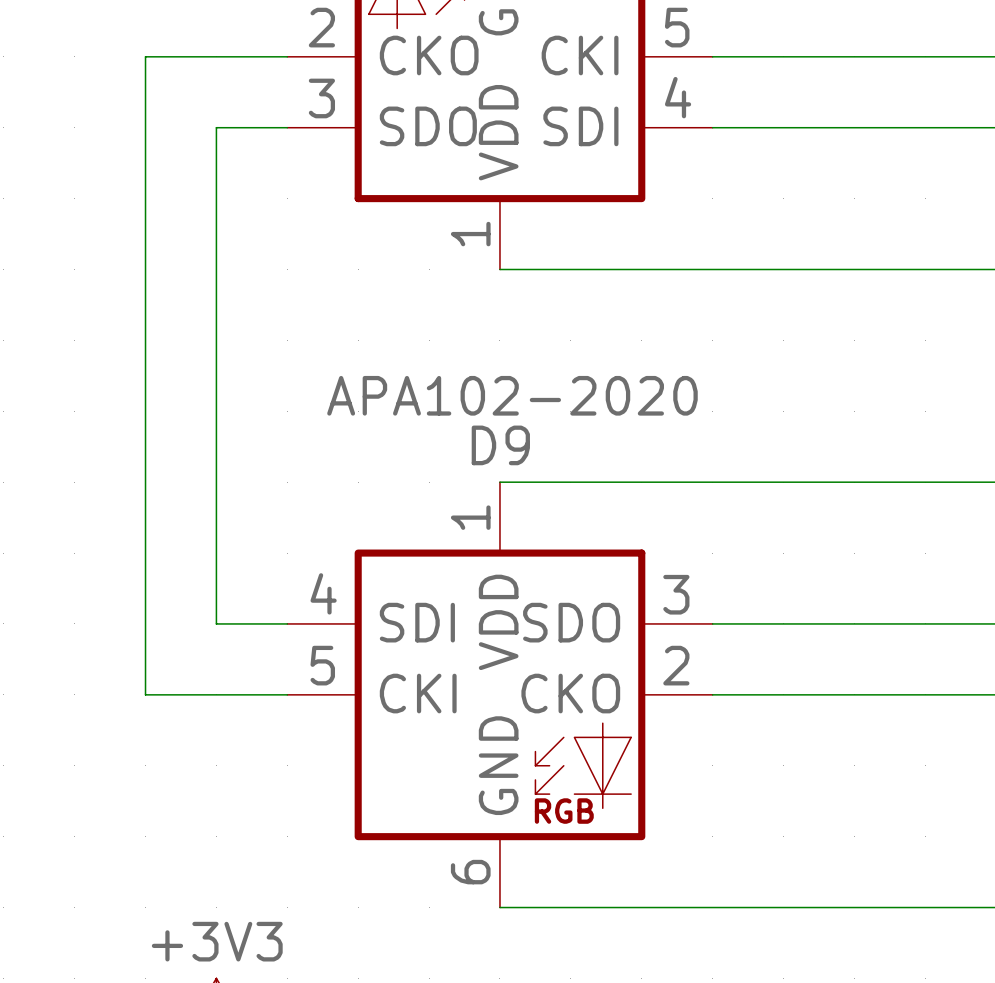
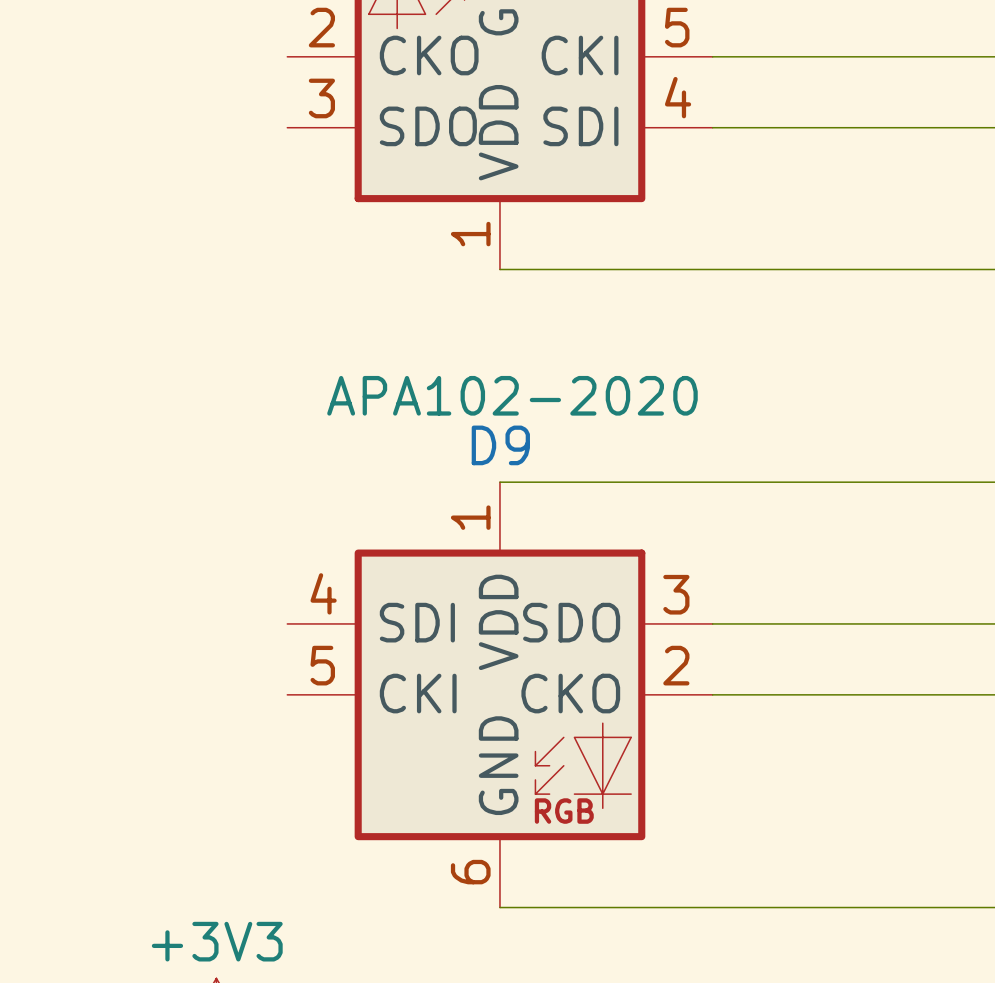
wire: (287, 56) (145, 56) (145, 694) (287, 694) -> none
wire: (287, 127) (216, 127) (216, 623) (287, 623) -> none

